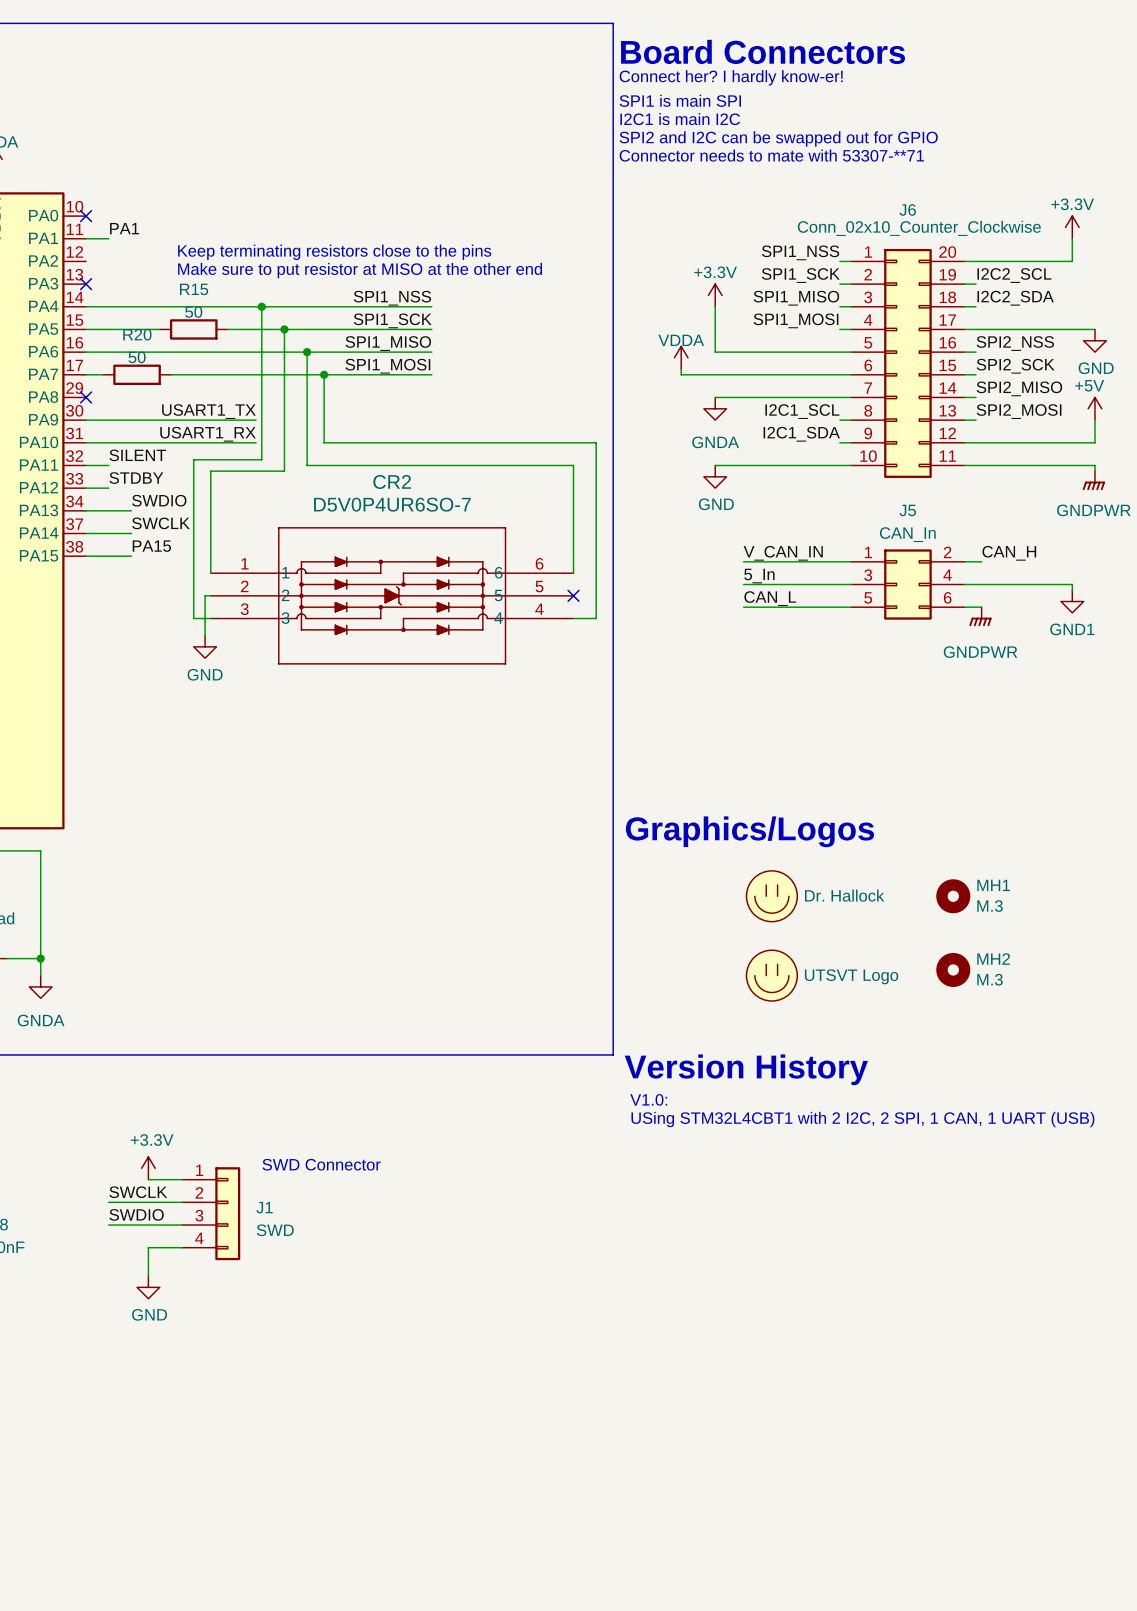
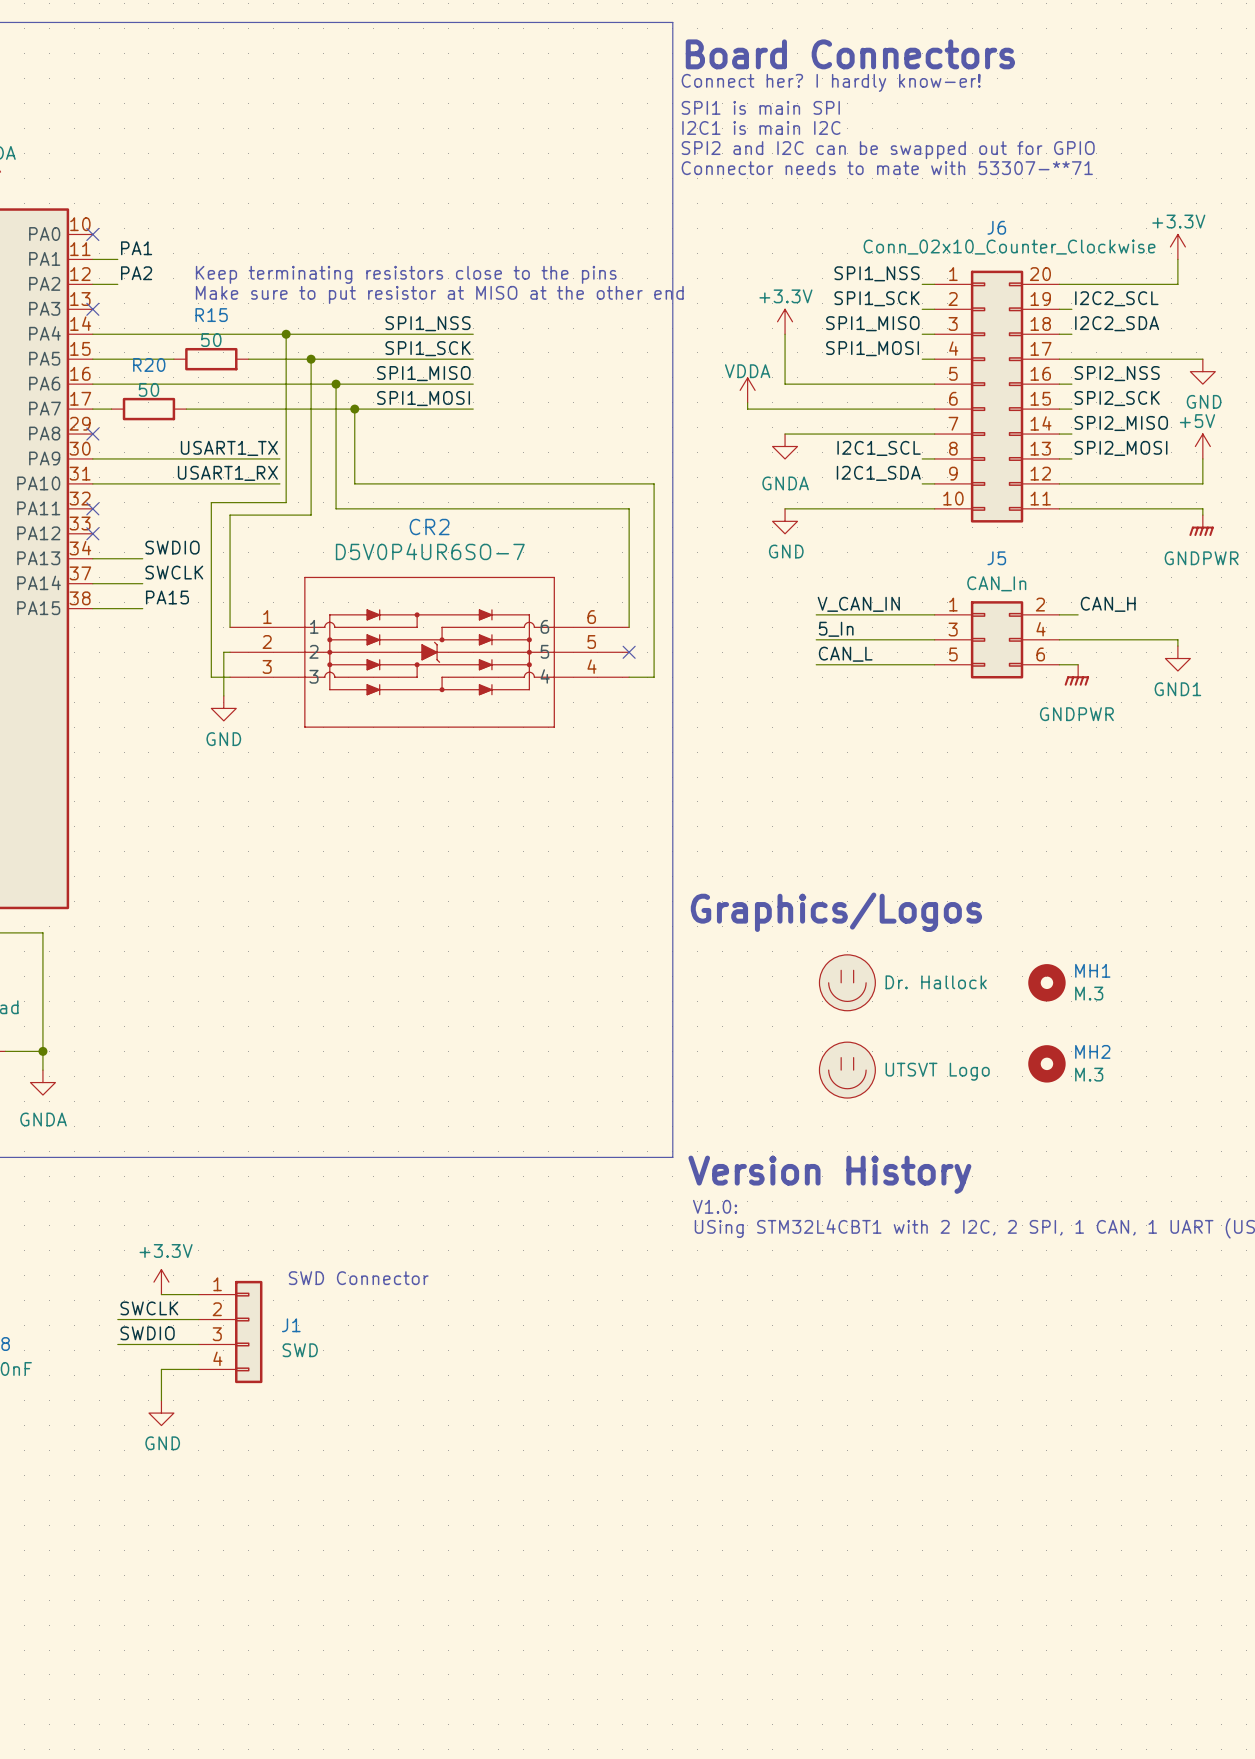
label: none -> PA2 (136, 273)
label: SILENT (137, 455) -> none
wire: (86, 465) (108, 465) -> (92, 284) (117, 284)
no-connect mark: none -> (92, 508)
label: STDBY (136, 478) -> none
wire: (86, 488) (108, 488) -> none
no-connect mark: none -> (92, 533)

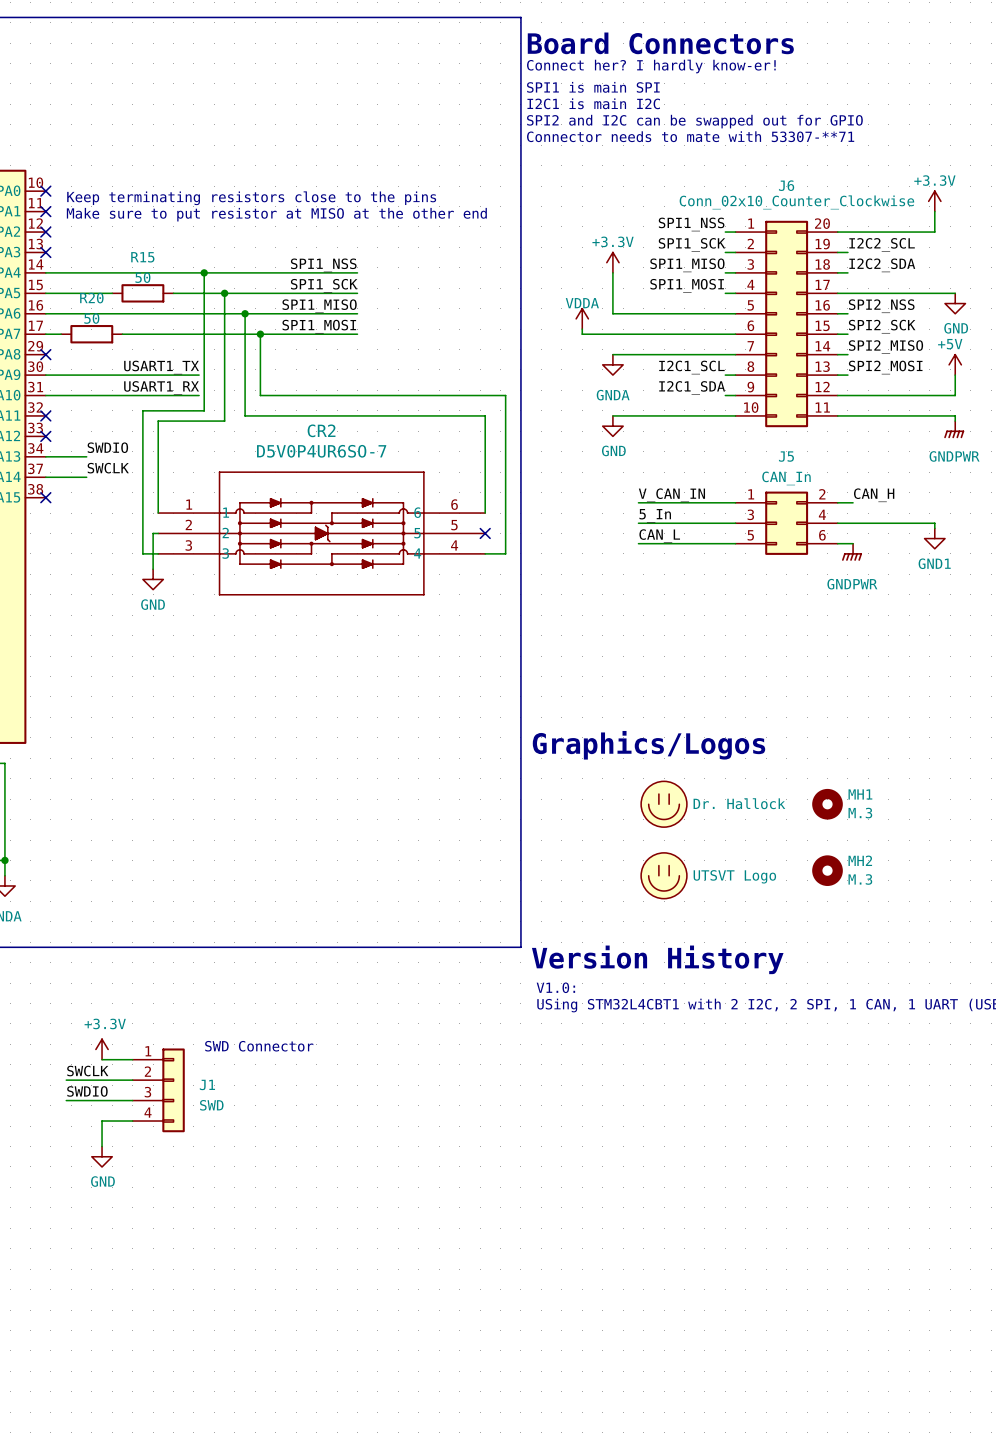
label: PA1 (136, 248) -> none
wire: (92, 259) (117, 259) -> none
no-connect mark: none -> (45, 211)
label: PA2 (136, 273) -> none
text position: Keep terminating resistors close to the pins (406, 274) -> Keep terminating resistors close to the pins (251, 198)
wire: (92, 284) (117, 284) -> none
no-connect mark: none -> (45, 232)
text position: Make sure to put resistor at MISO at the other end (439, 294) -> Make sure to put resistor at MISO at the other end (276, 214)
label: PA15 (167, 597) -> none
wire: (92, 608) (142, 608) -> none
no-connect mark: none -> (45, 497)

